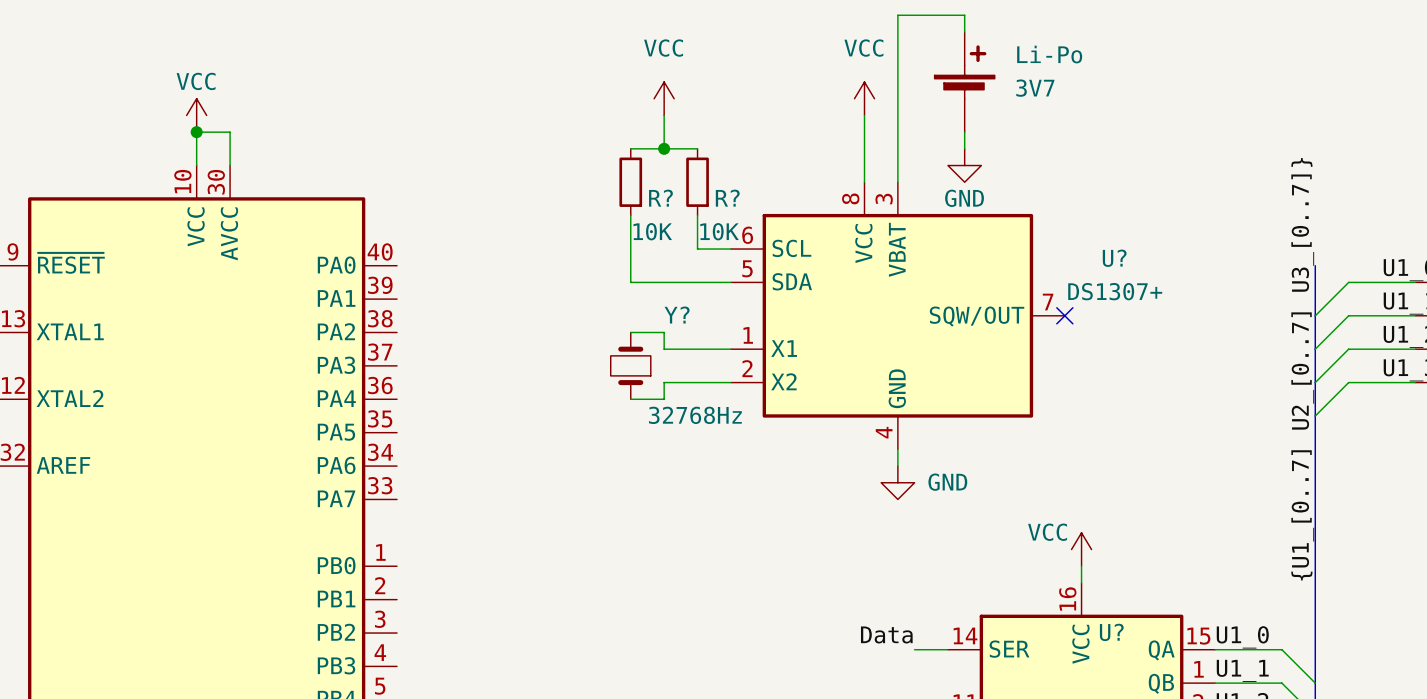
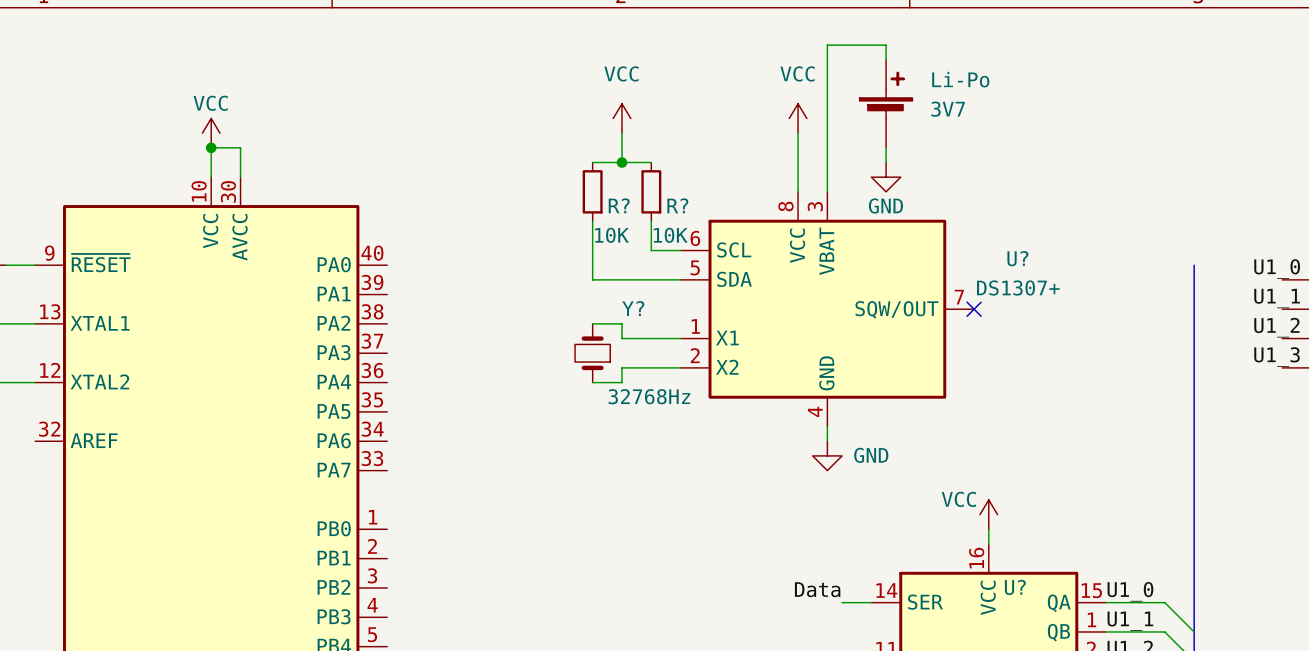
wire: (1415, 282) (1348, 282) (1315, 315) -> none
wire: (1415, 315) (1348, 315) (1315, 349) -> none
wire: (1415, 349) (1348, 349) (1315, 382) -> none
label: {U1_[0..7] U2_[0..7] U3_[0..7]} (1302, 369) -> none
wire: (1415, 382) (1348, 382) (1315, 415) -> none

